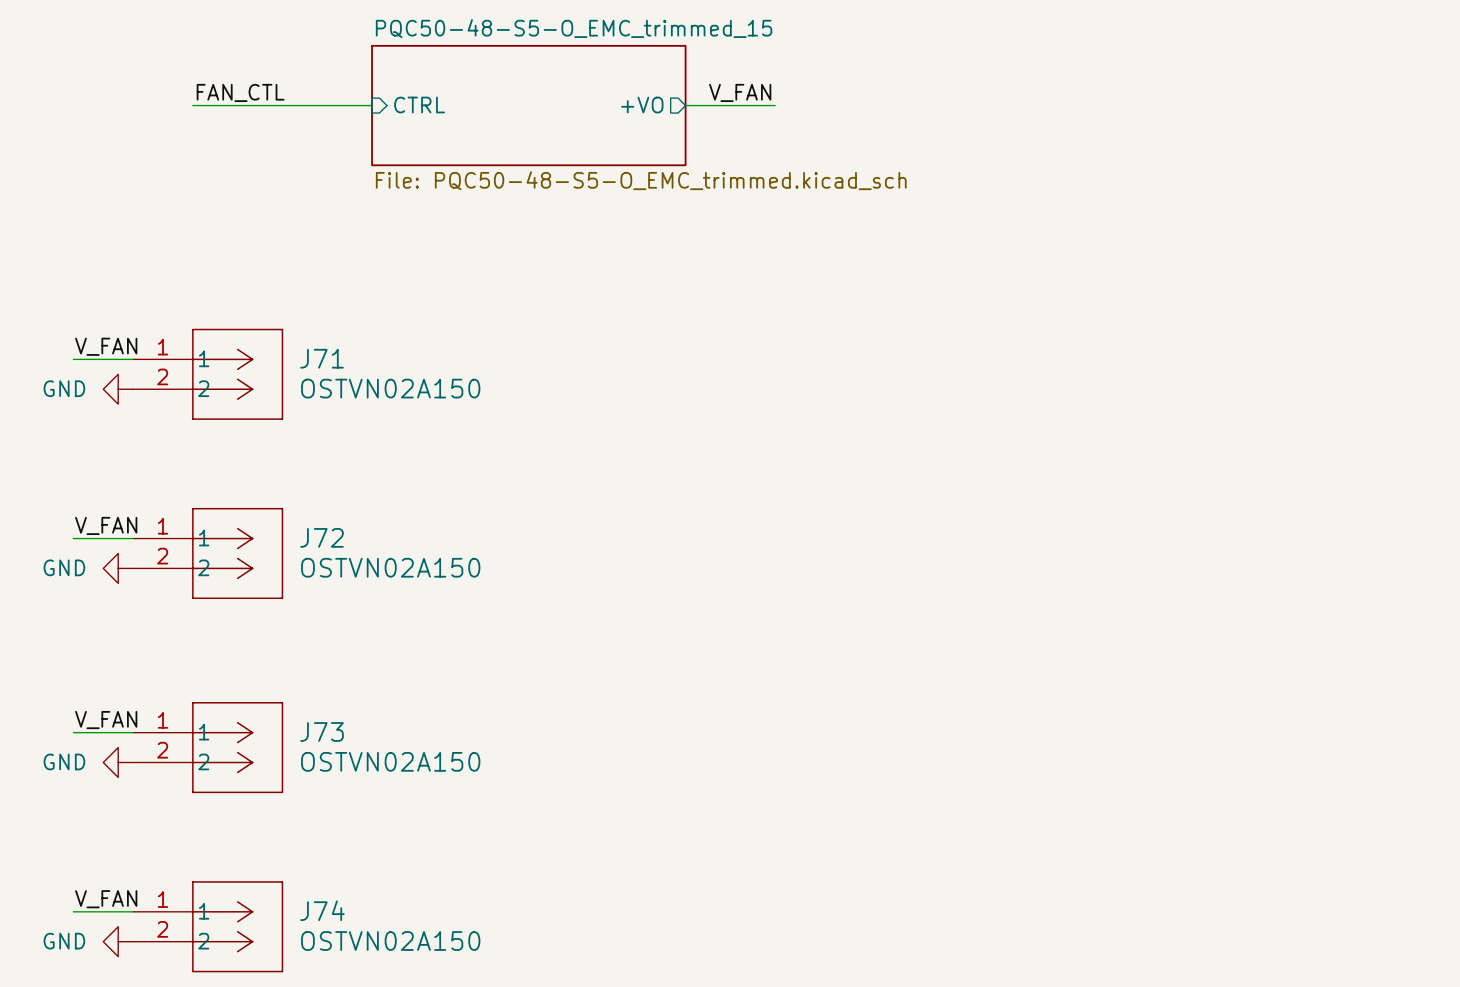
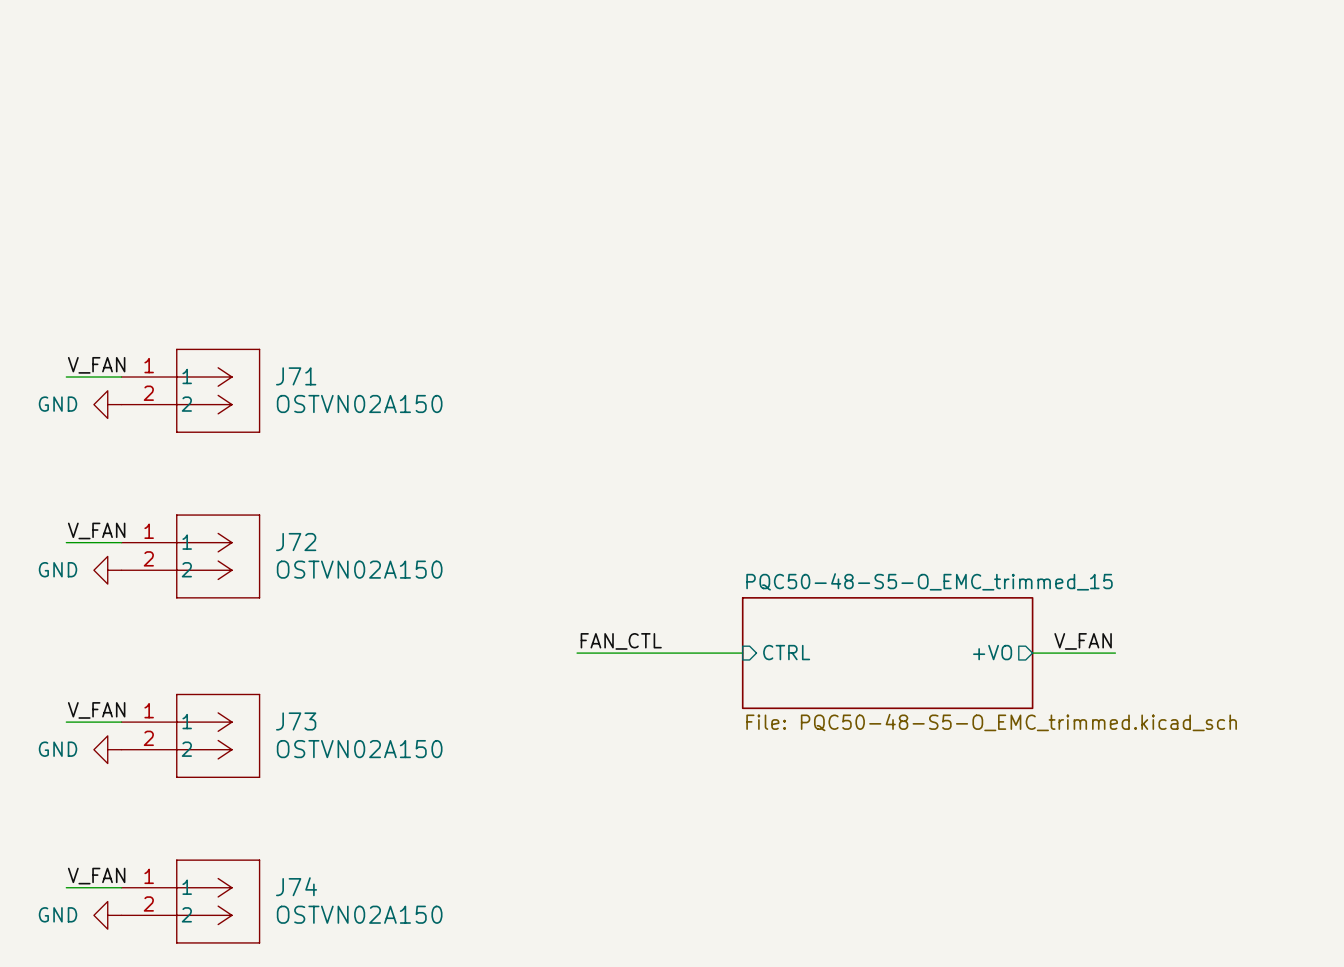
label: FAN_CTL (240, 92) -> none
label: V_FAN (740, 92) -> none
wire: (192, 105) (372, 105) -> none
sheet pin: CTRL (419, 105) -> none
sheet PQC50-48-S5-O_EMC_trimmed_15 position: (528, 105) -> (887, 653)
sheet pin: +VO (642, 105) -> none
wire: (685, 105) (775, 105) -> none
label: none -> FAN_CTL (621, 641)
label: none -> V_FAN (1083, 641)
sheet pin: none -> CTRL (786, 652)
sheet pin: none -> +VO (992, 652)
wire: none -> (577, 653) (742, 653)
wire: none -> (1032, 653) (1115, 653)

